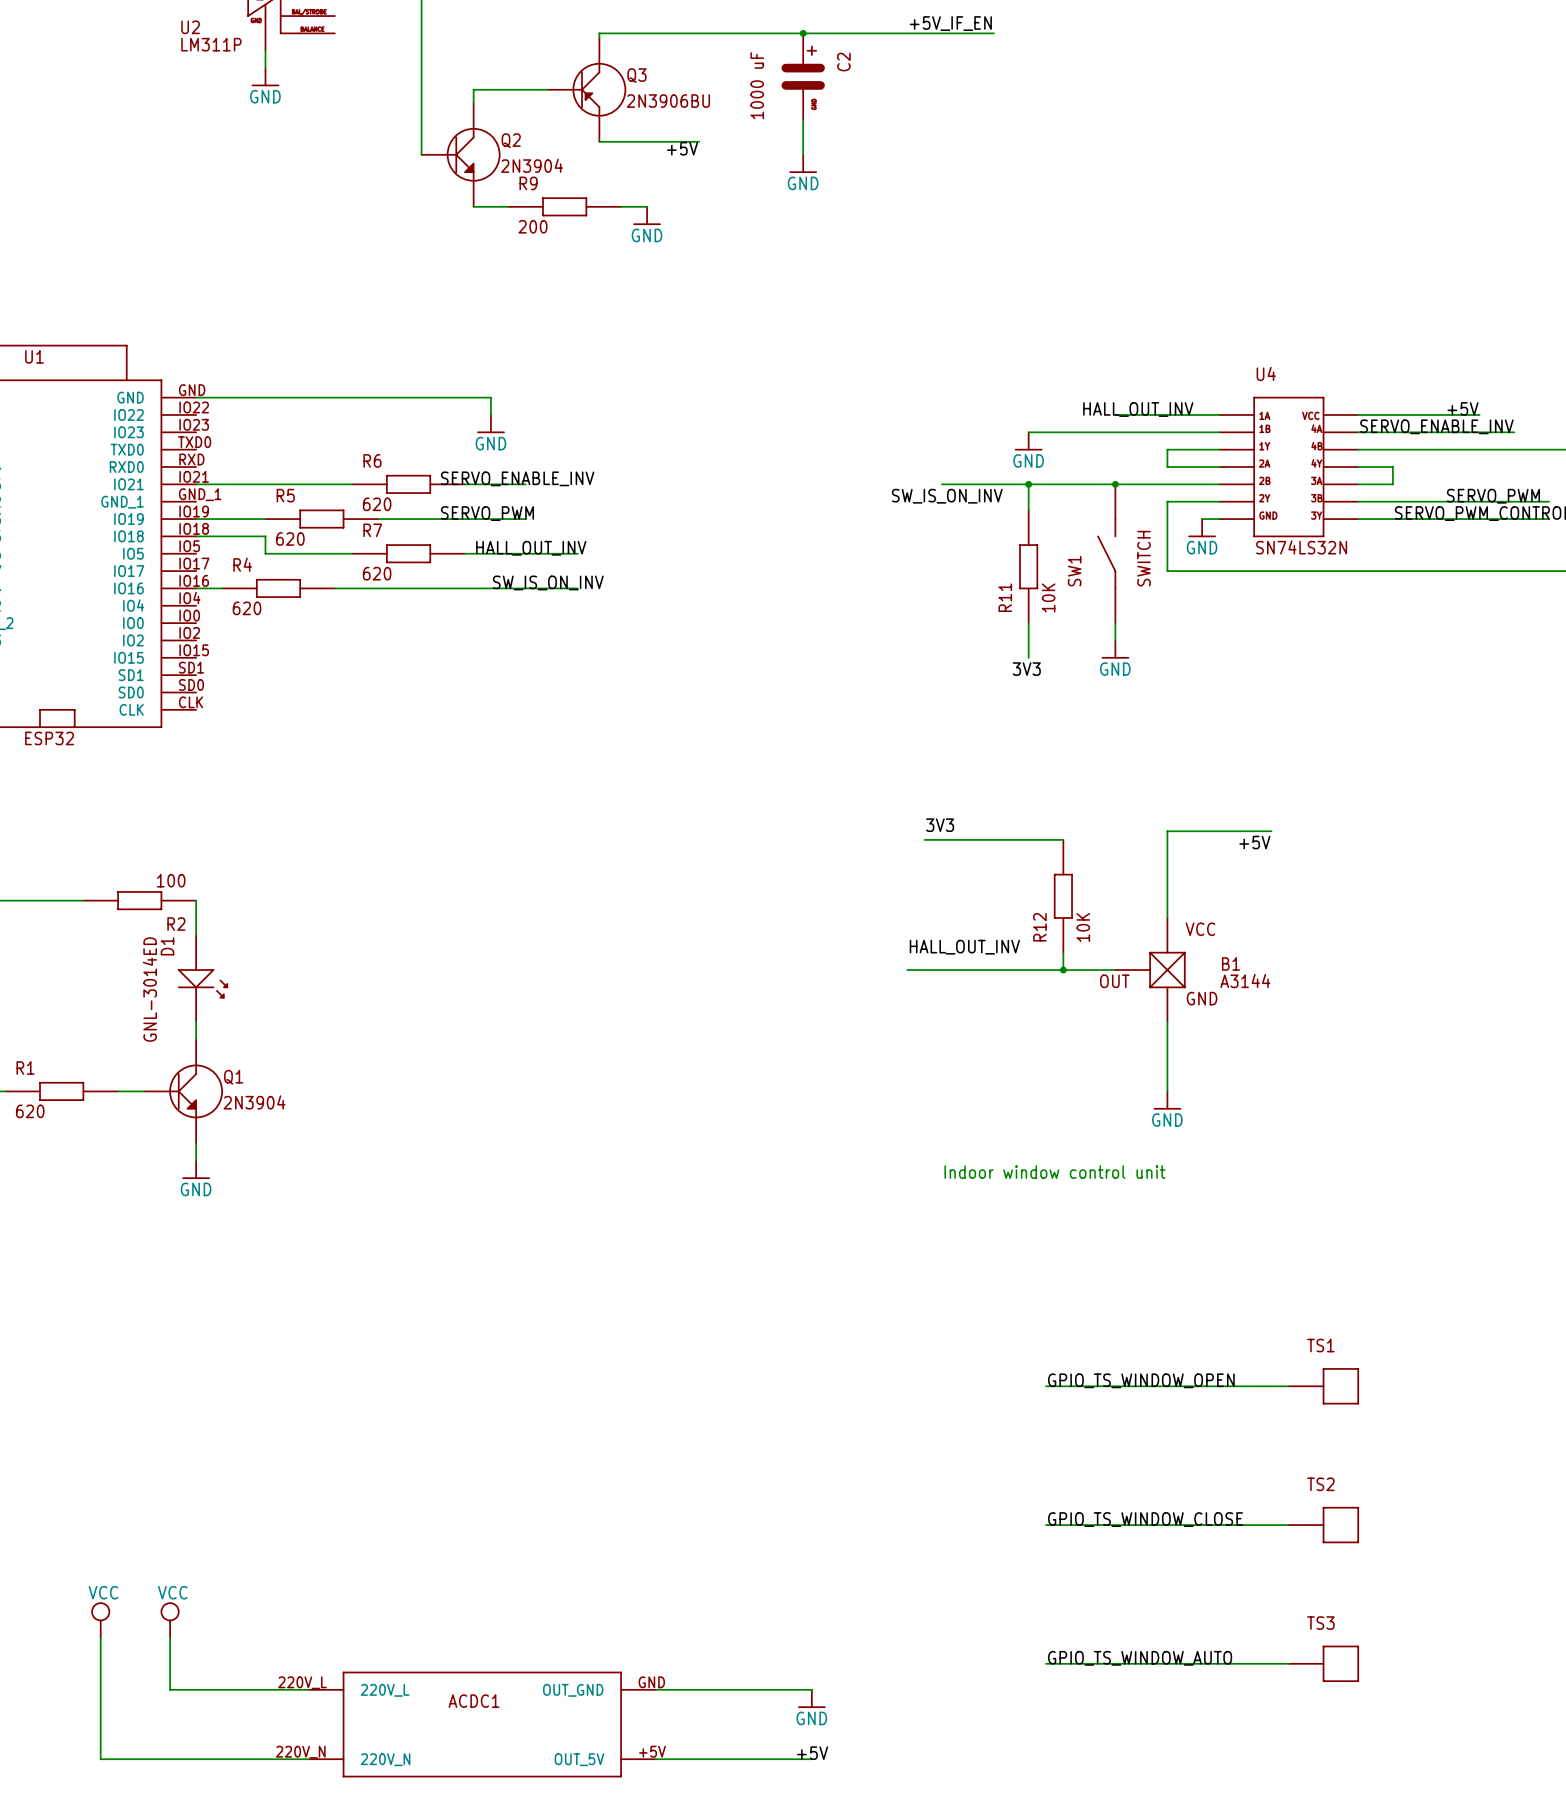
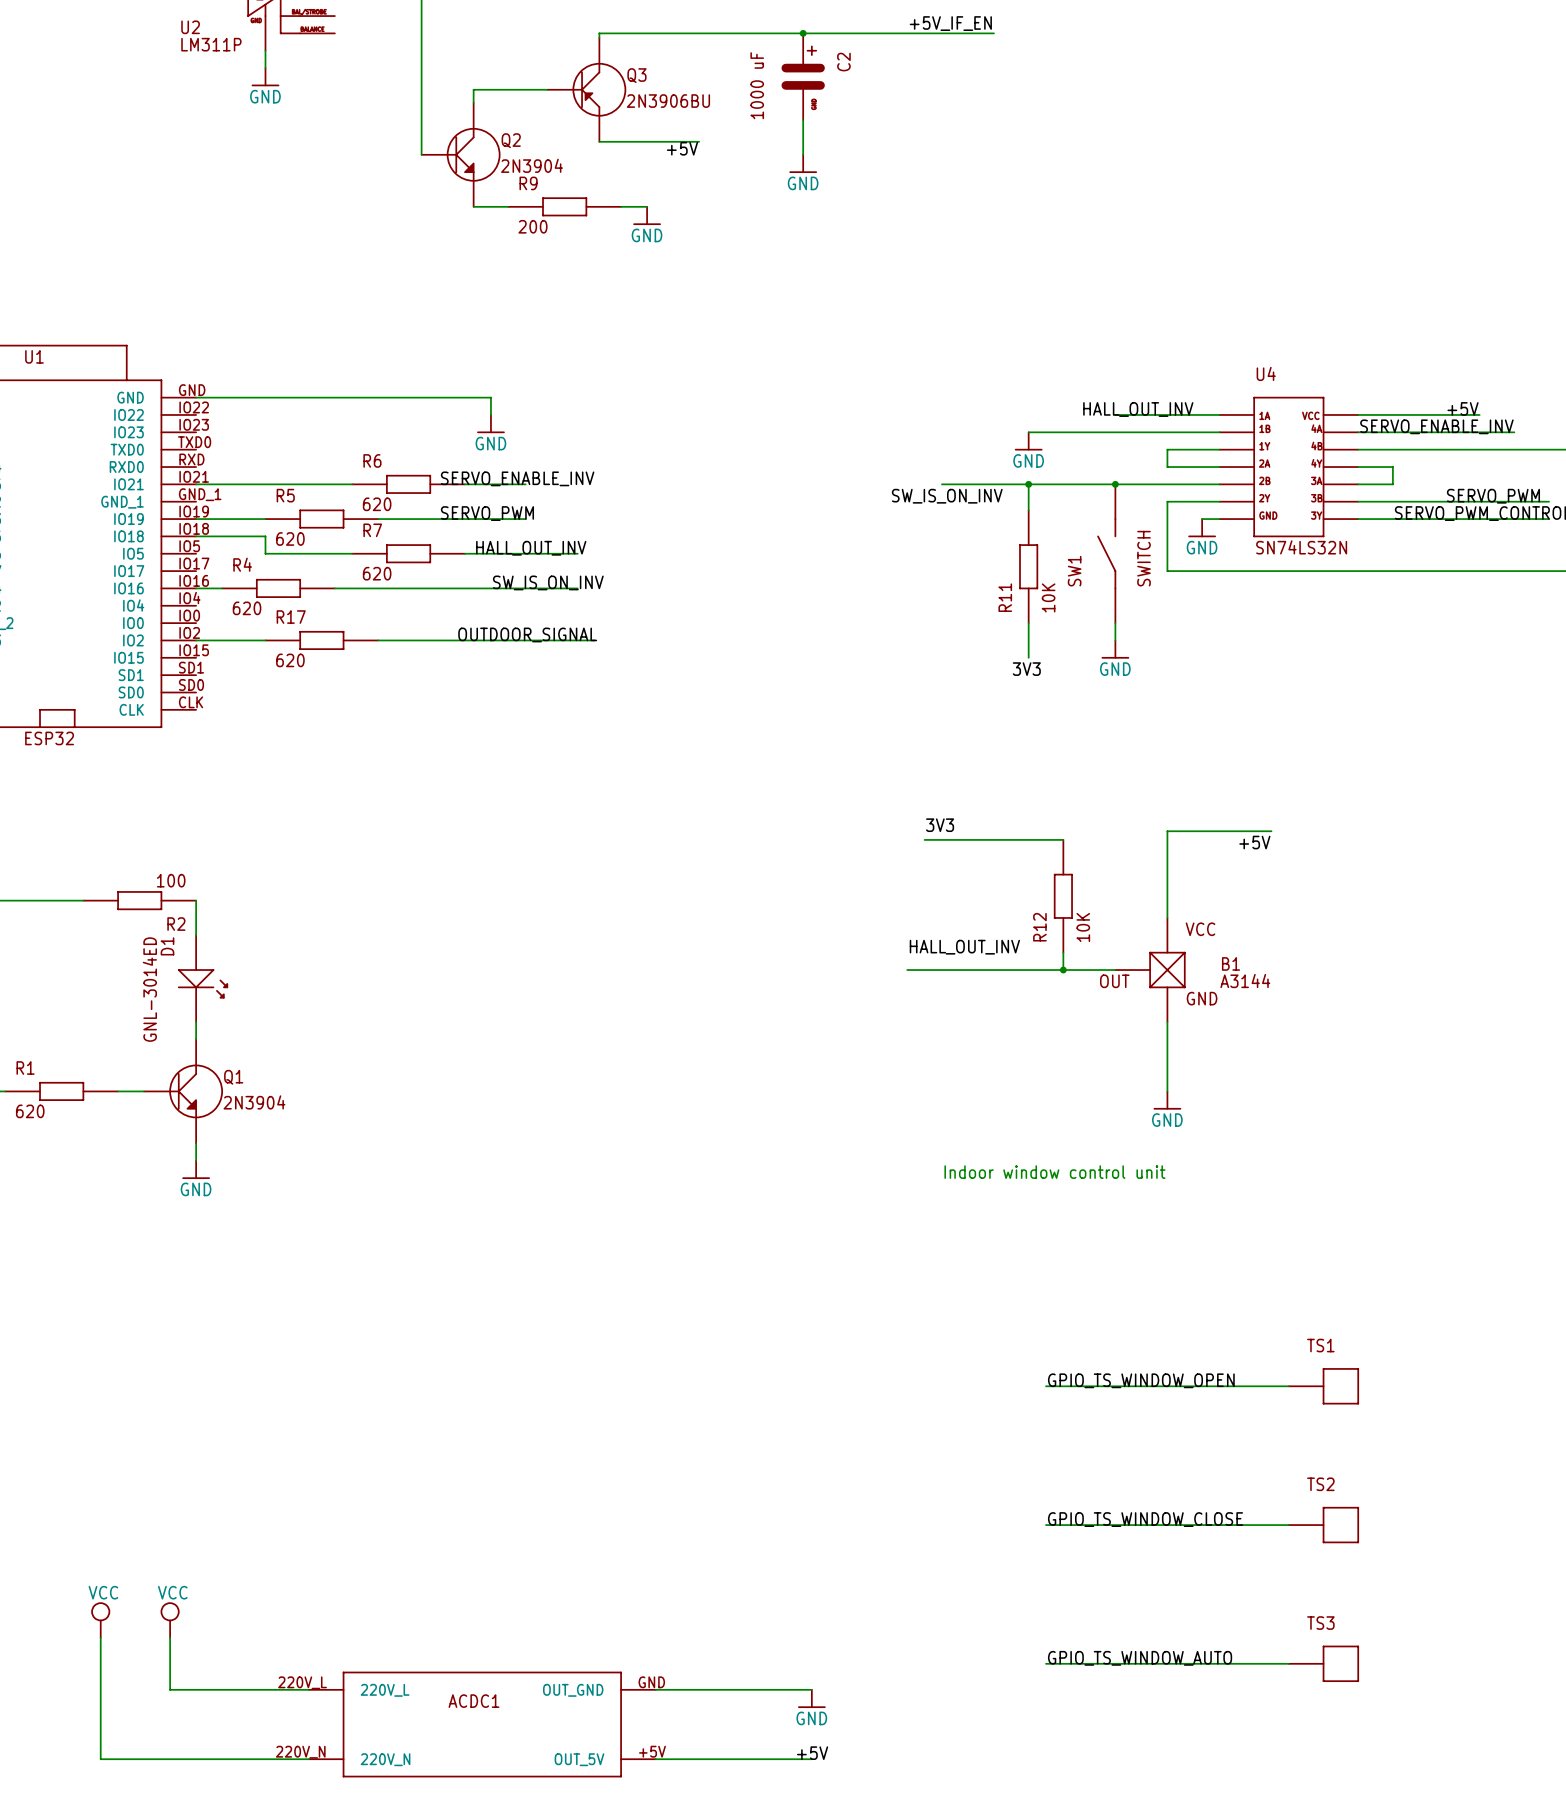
label: none -> OUTDOOR_SIGNAL (527, 634)
wire: none -> (196, 640) (265, 640)
R17: none -> 620 (321, 640)
wire: none -> (378, 640) (595, 640)

